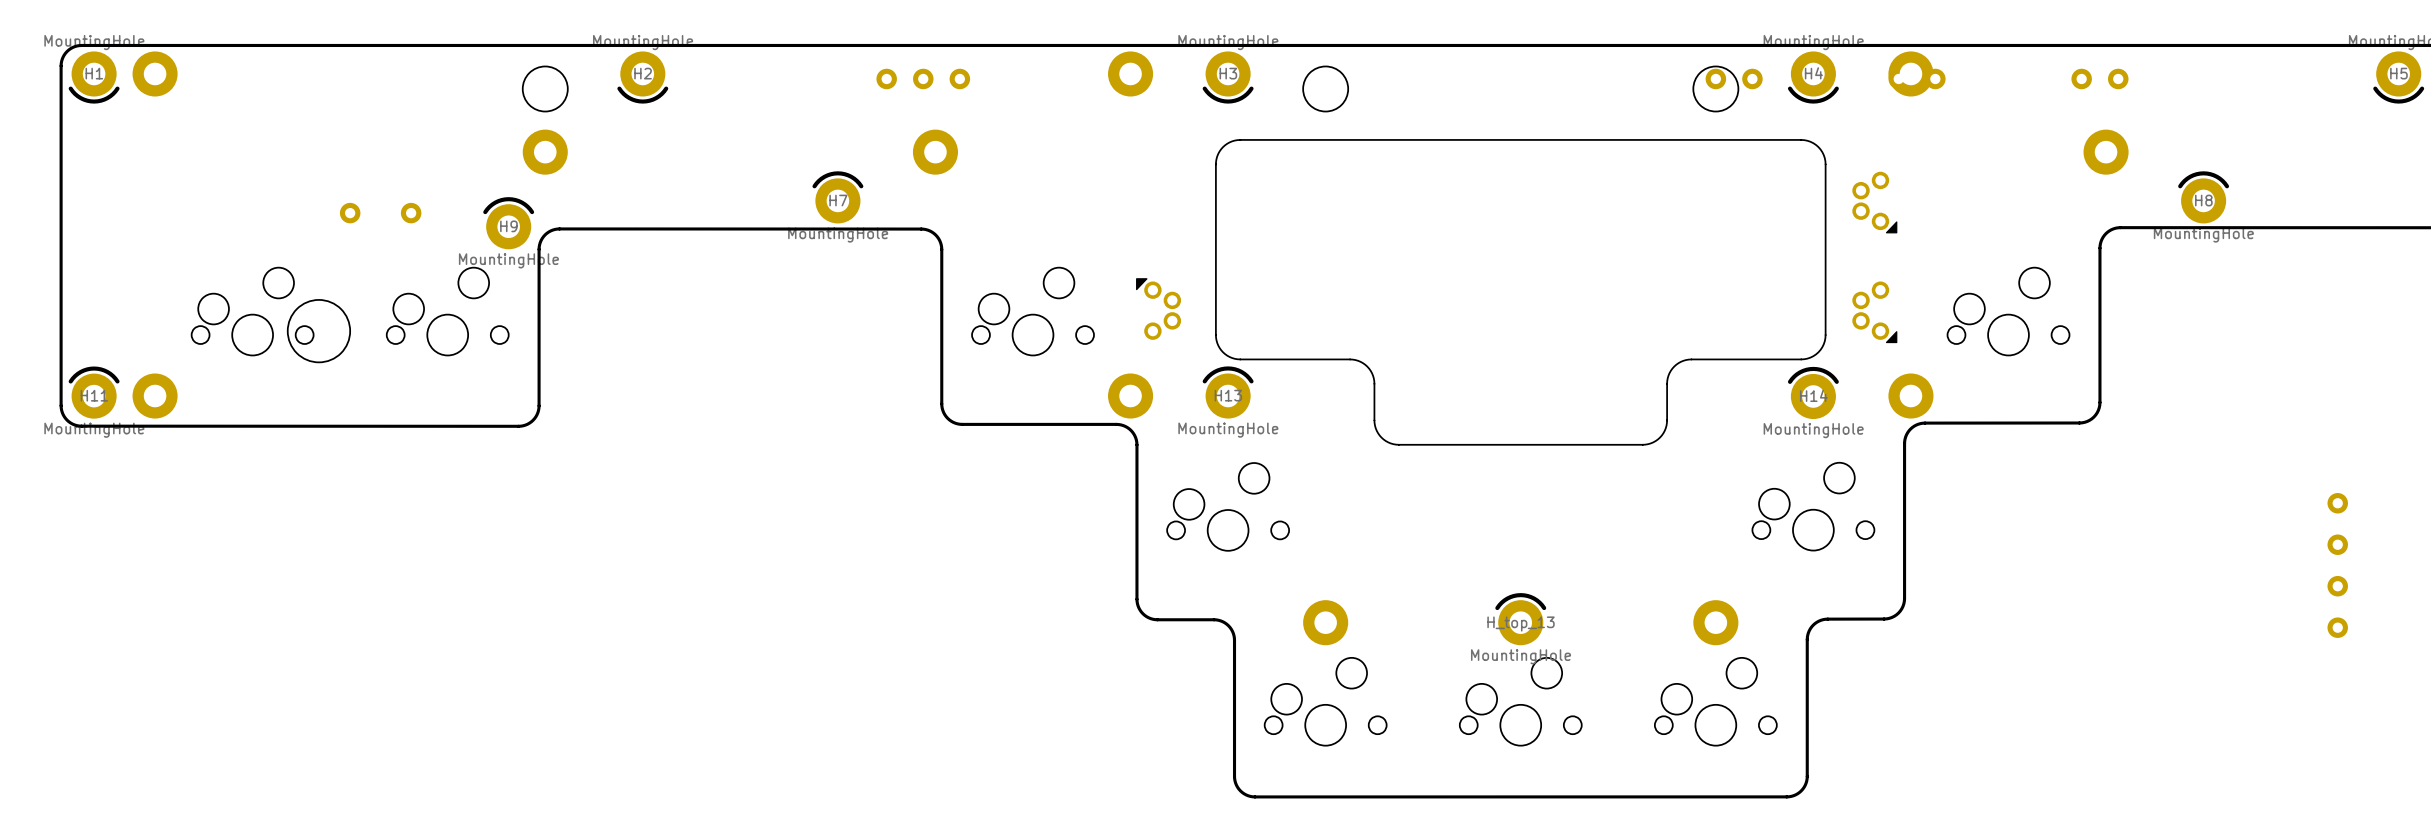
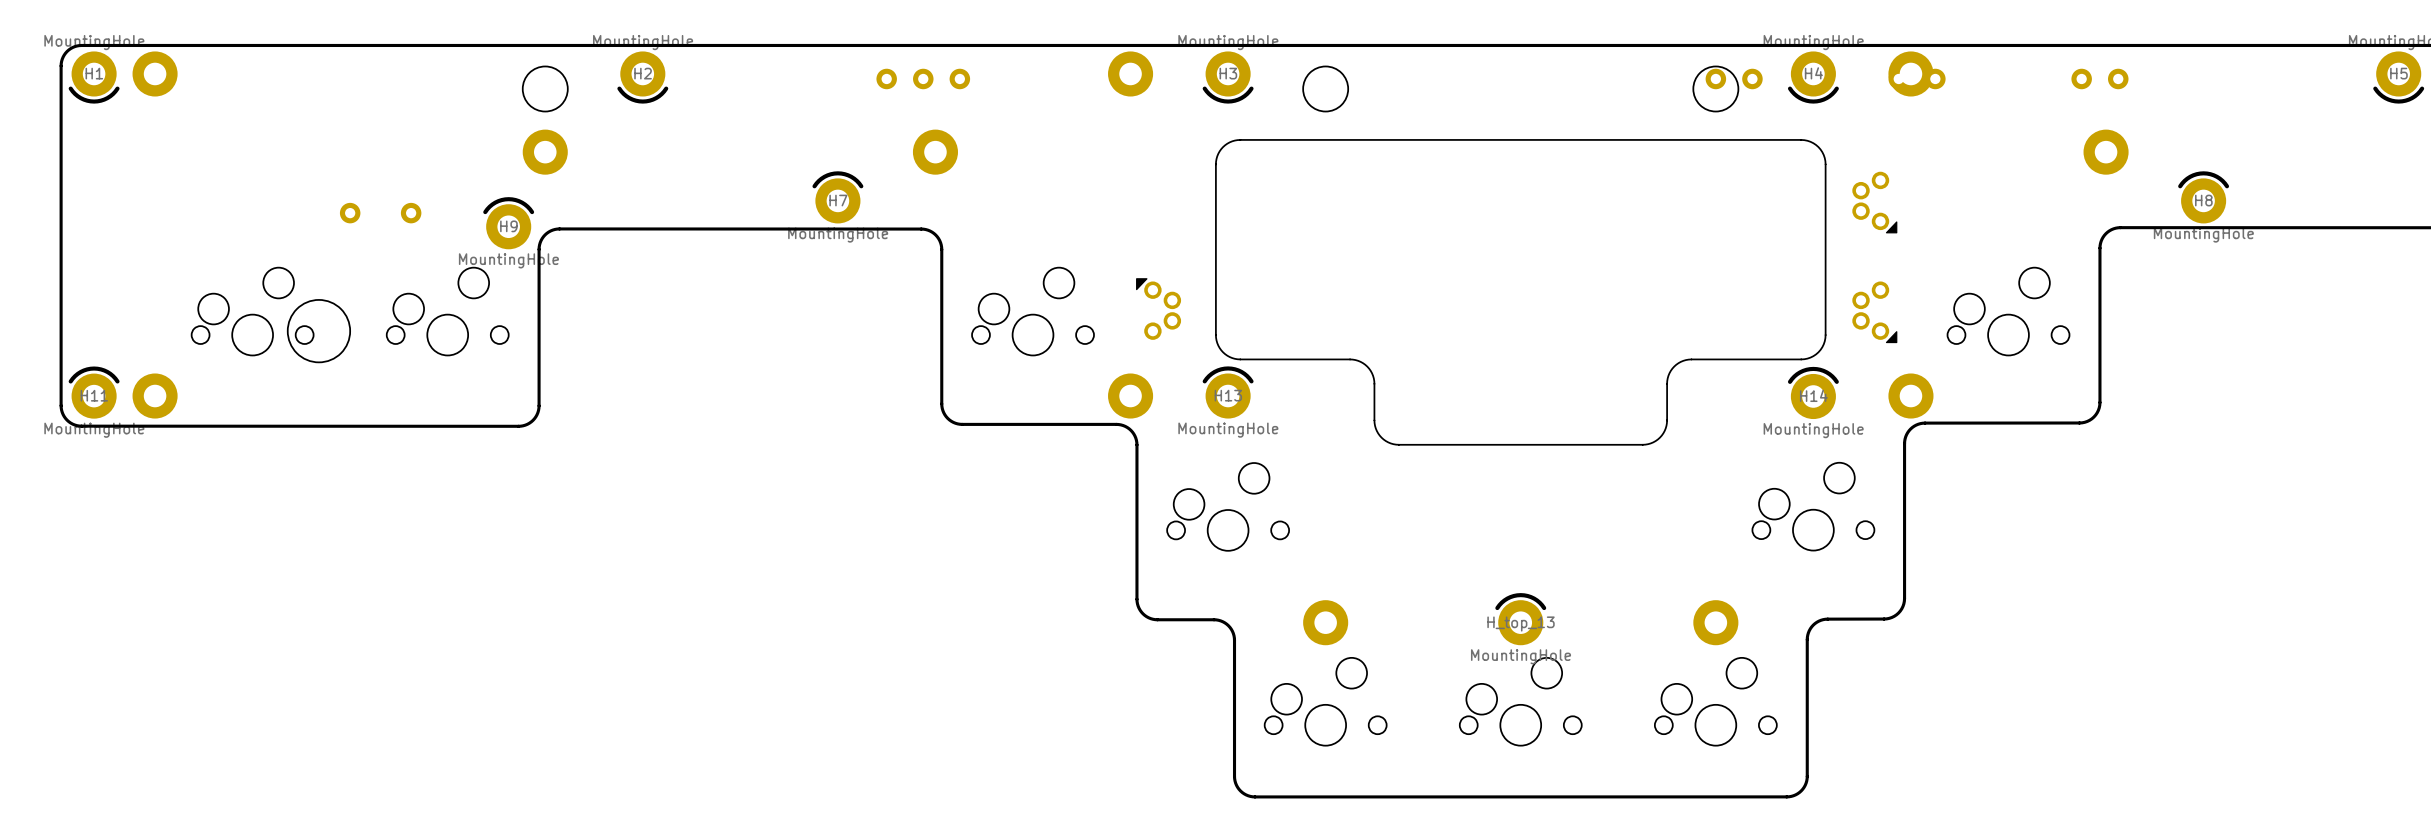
part: (2337, 503) -> none
part: (2337, 544) -> none
part: (2337, 586) -> none
part: (2337, 627) -> none

